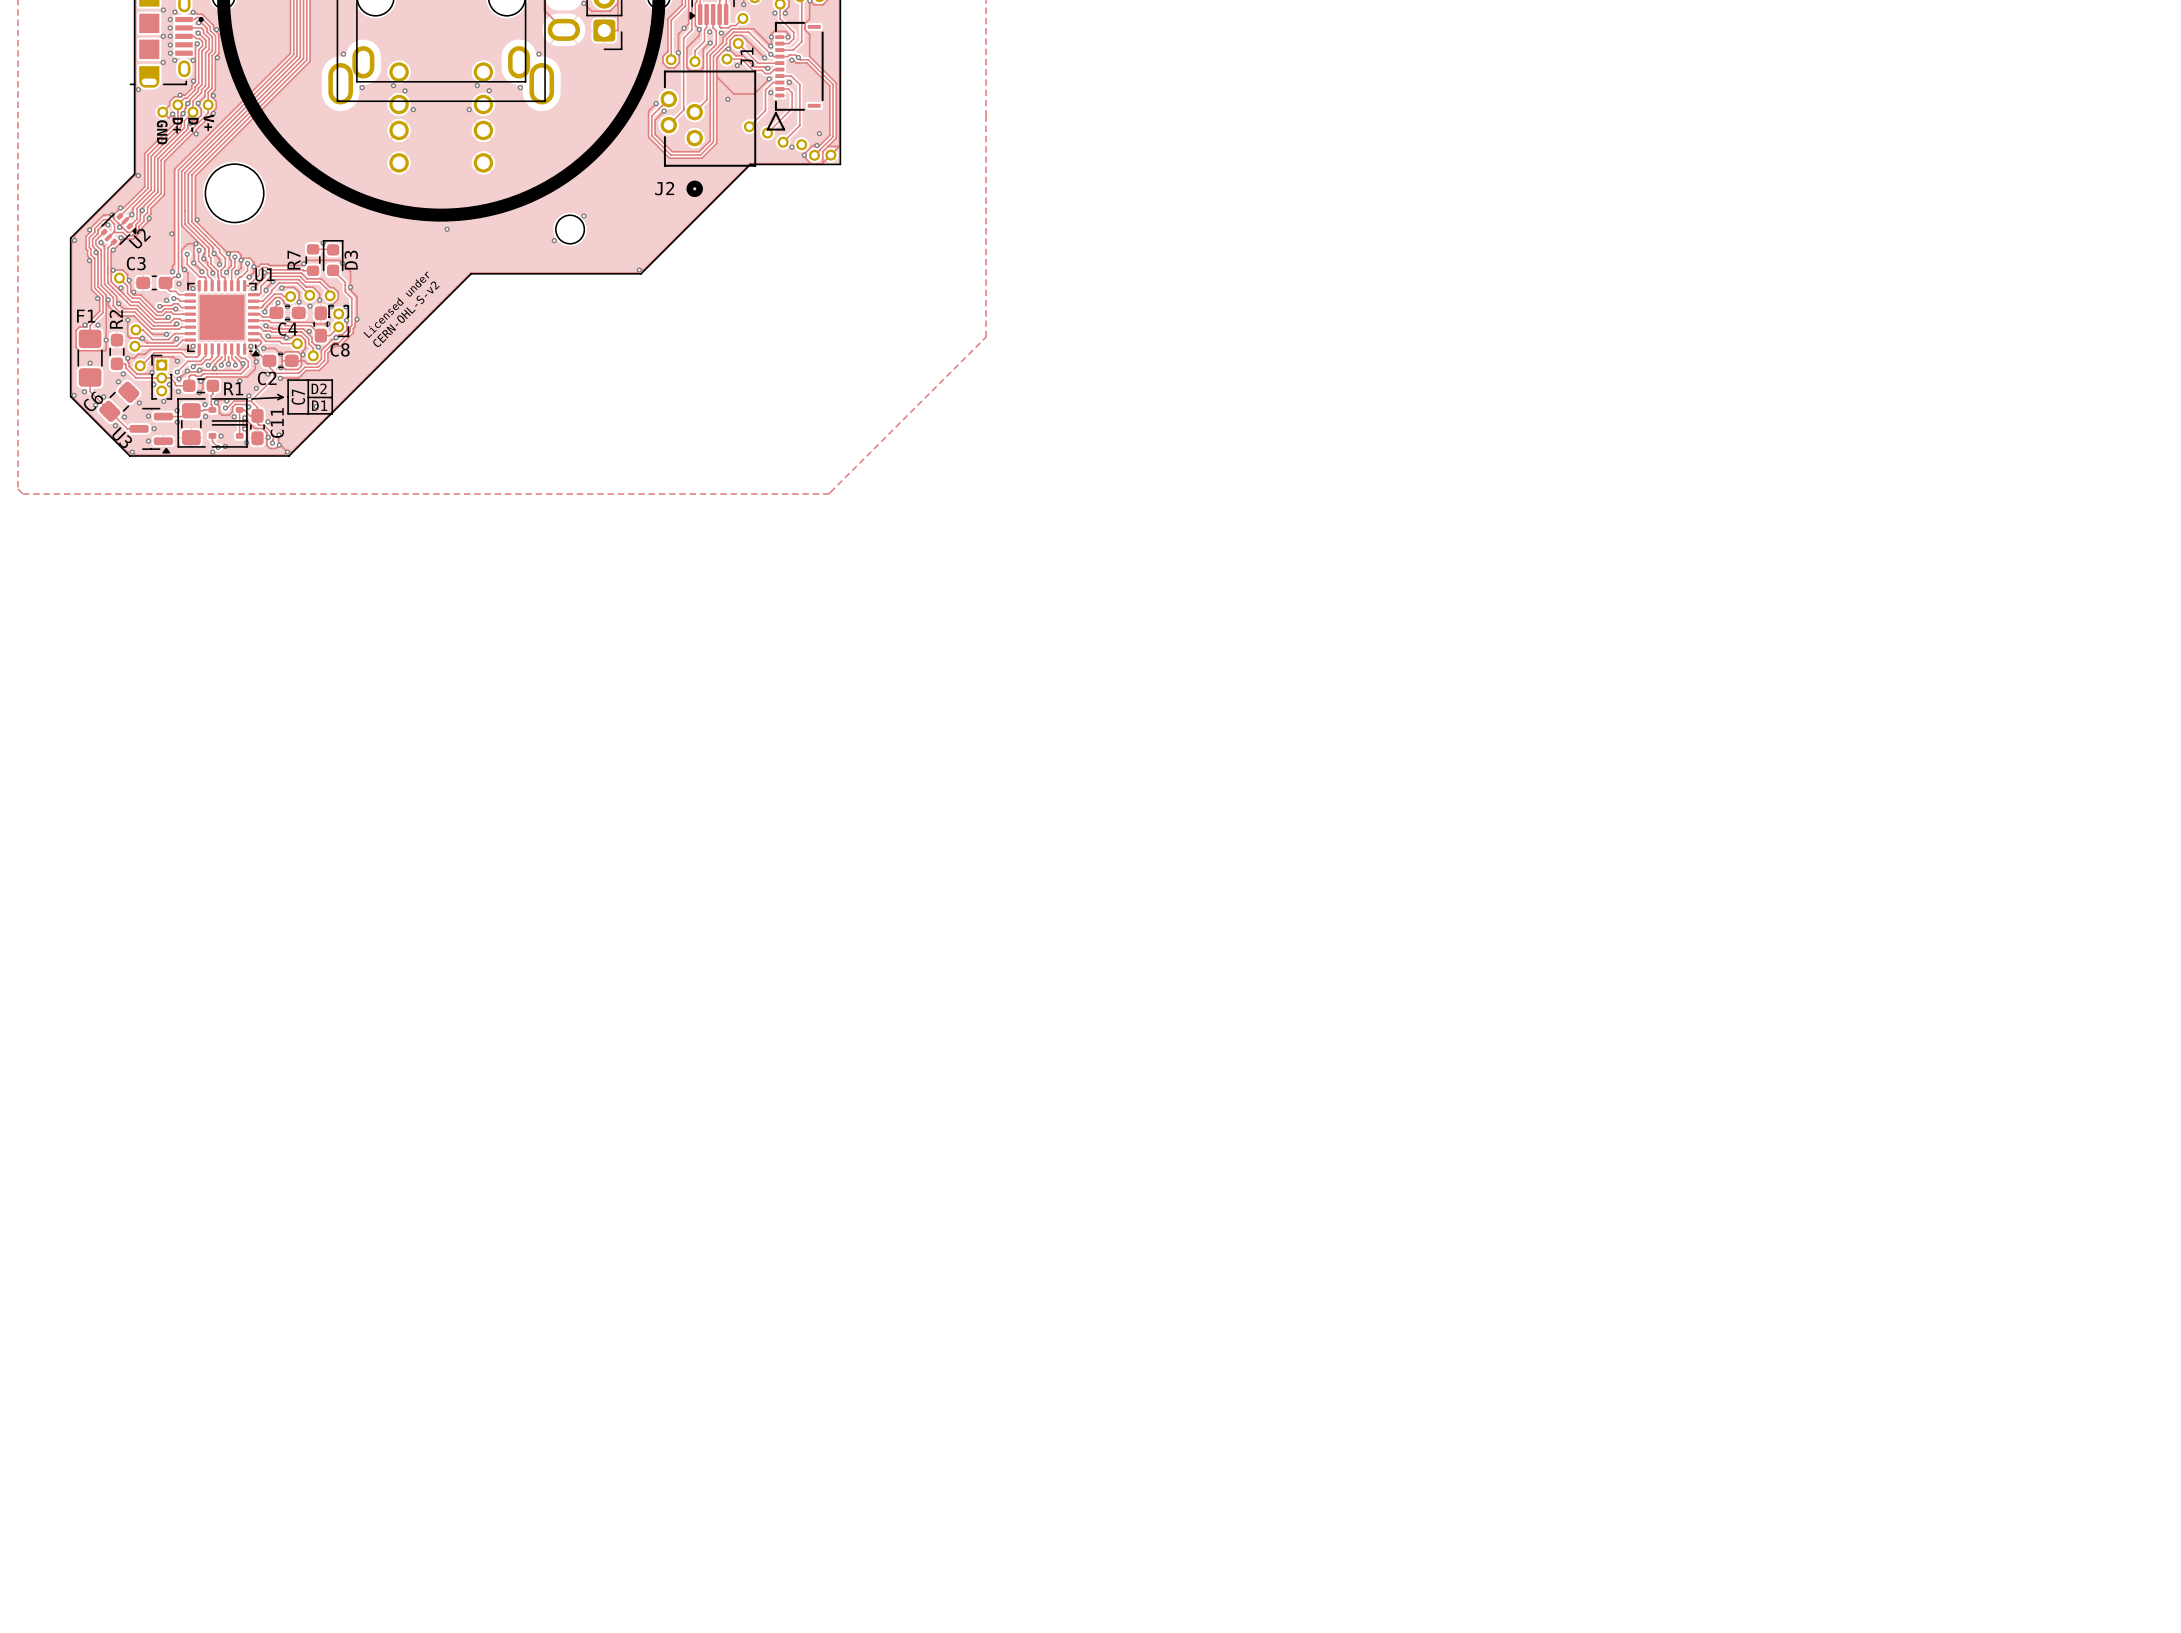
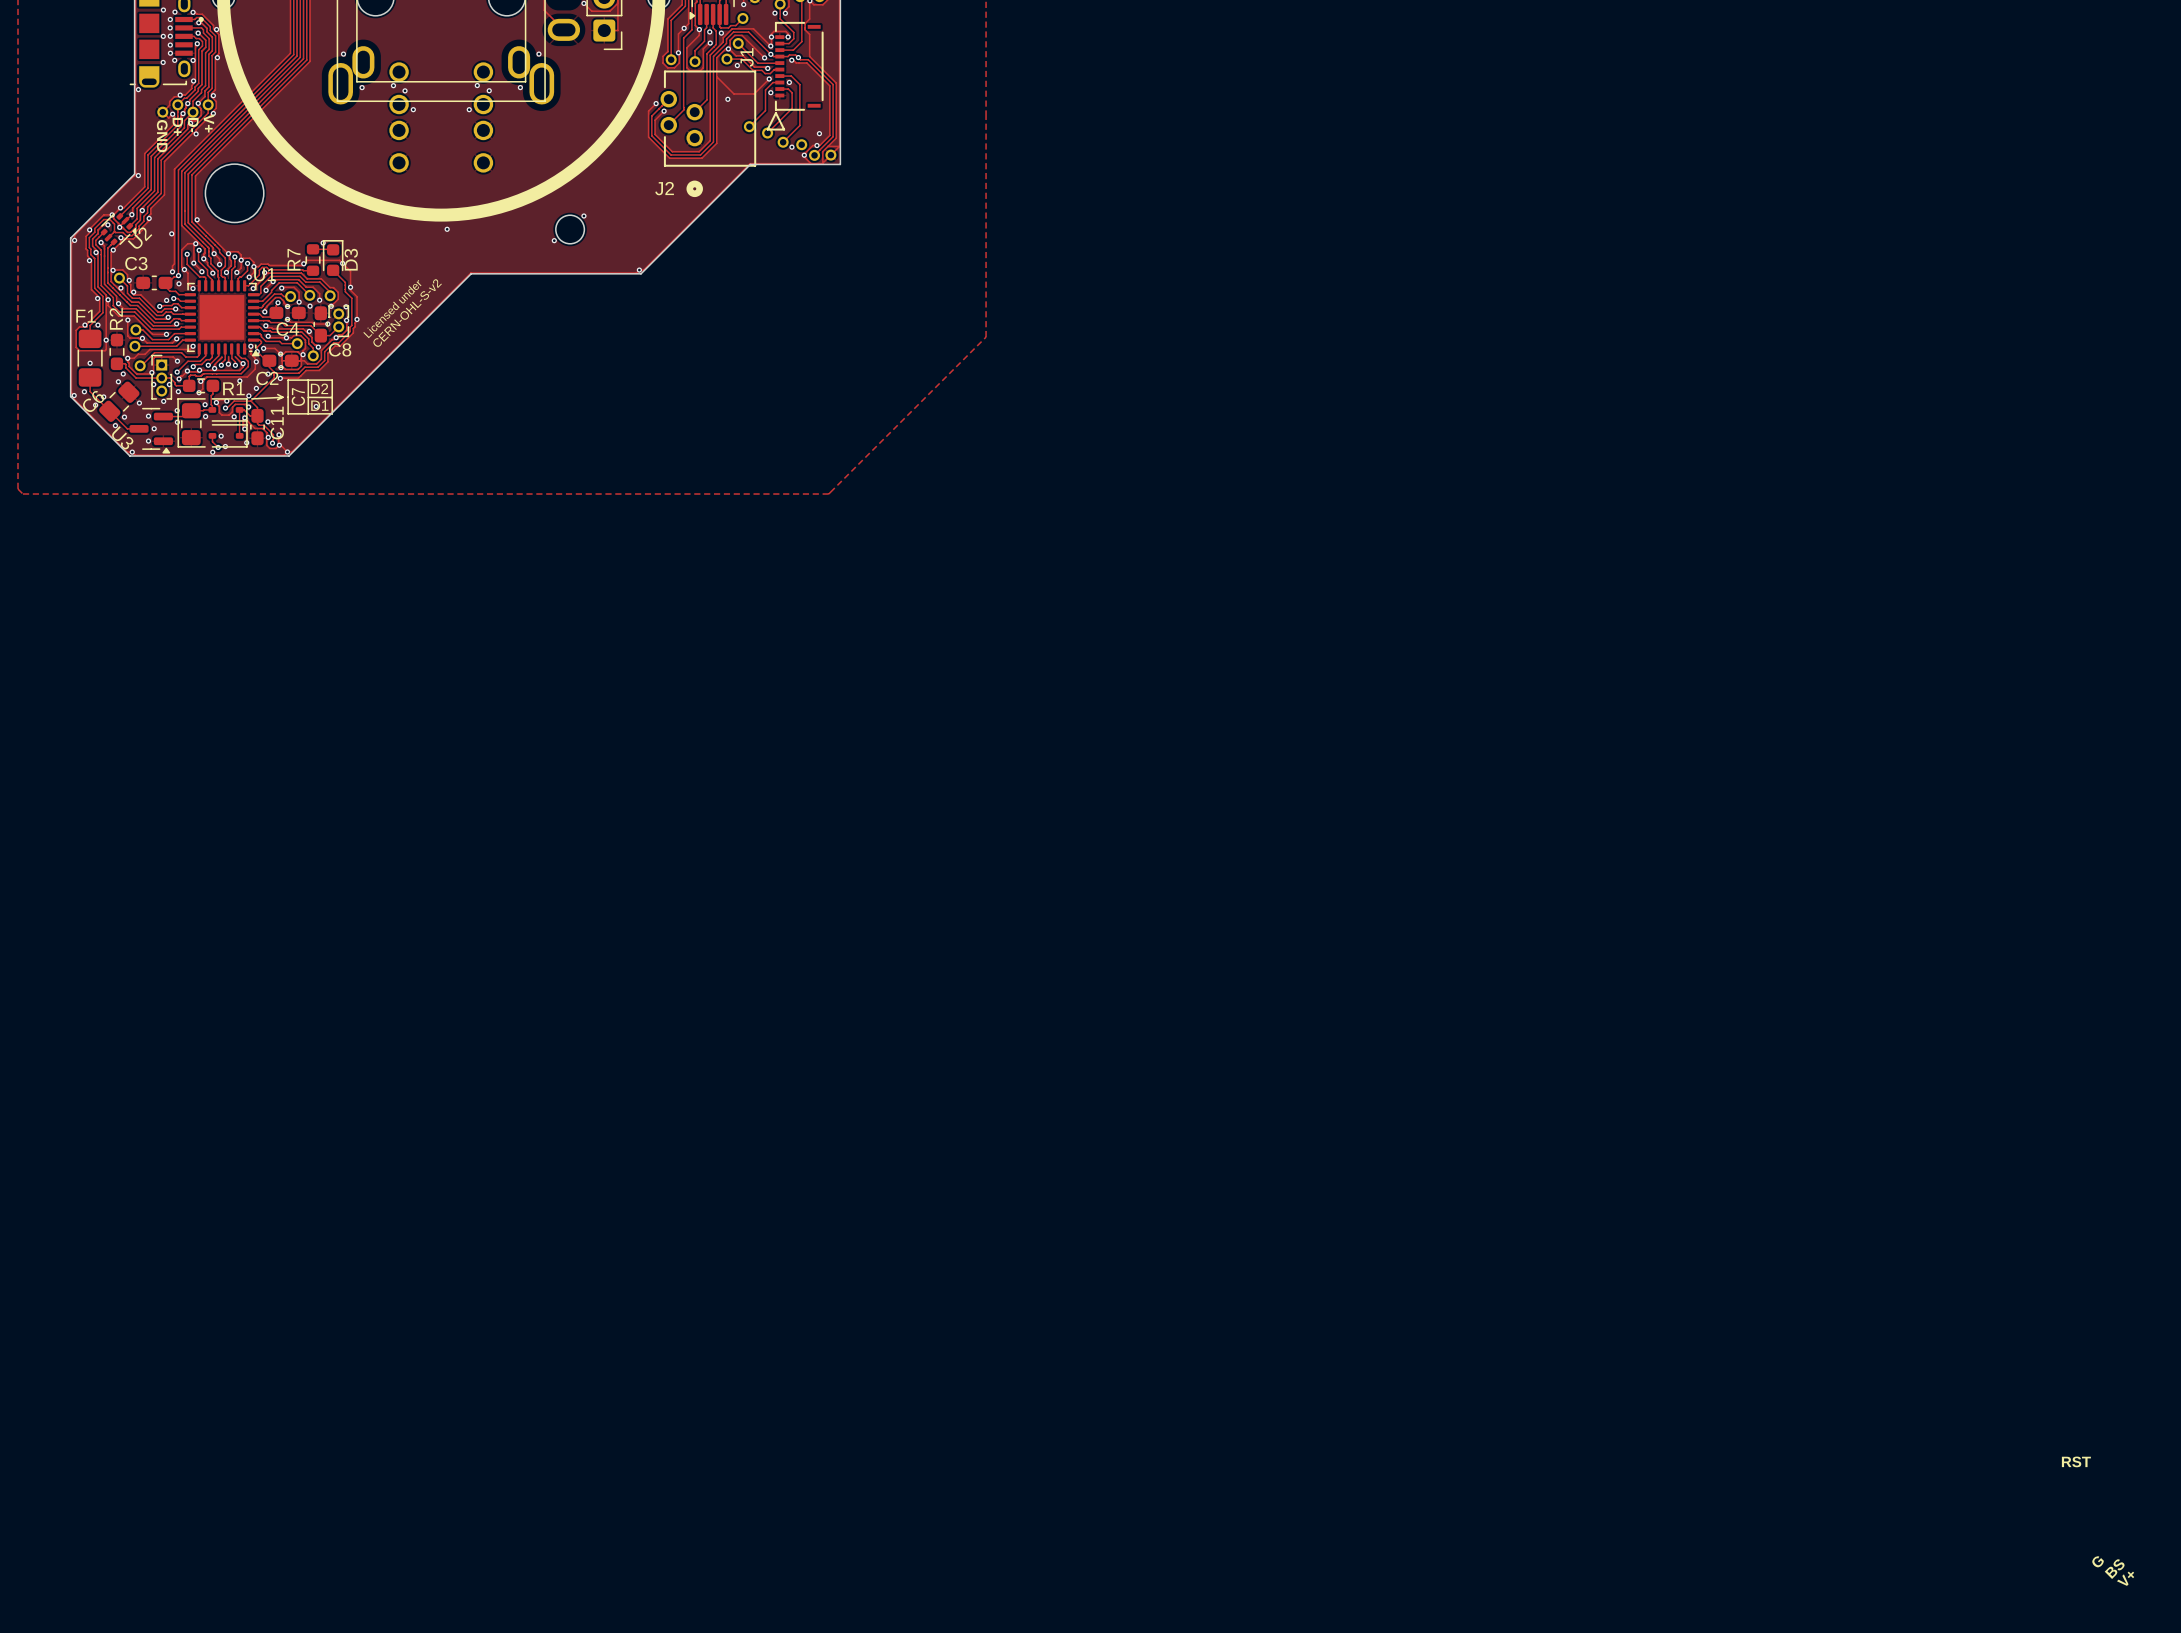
text: none -> RST (2076, 1461)
text: none -> G (2098, 1561)
text: none -> BS (2114, 1569)
text: none -> V+ (2125, 1578)

